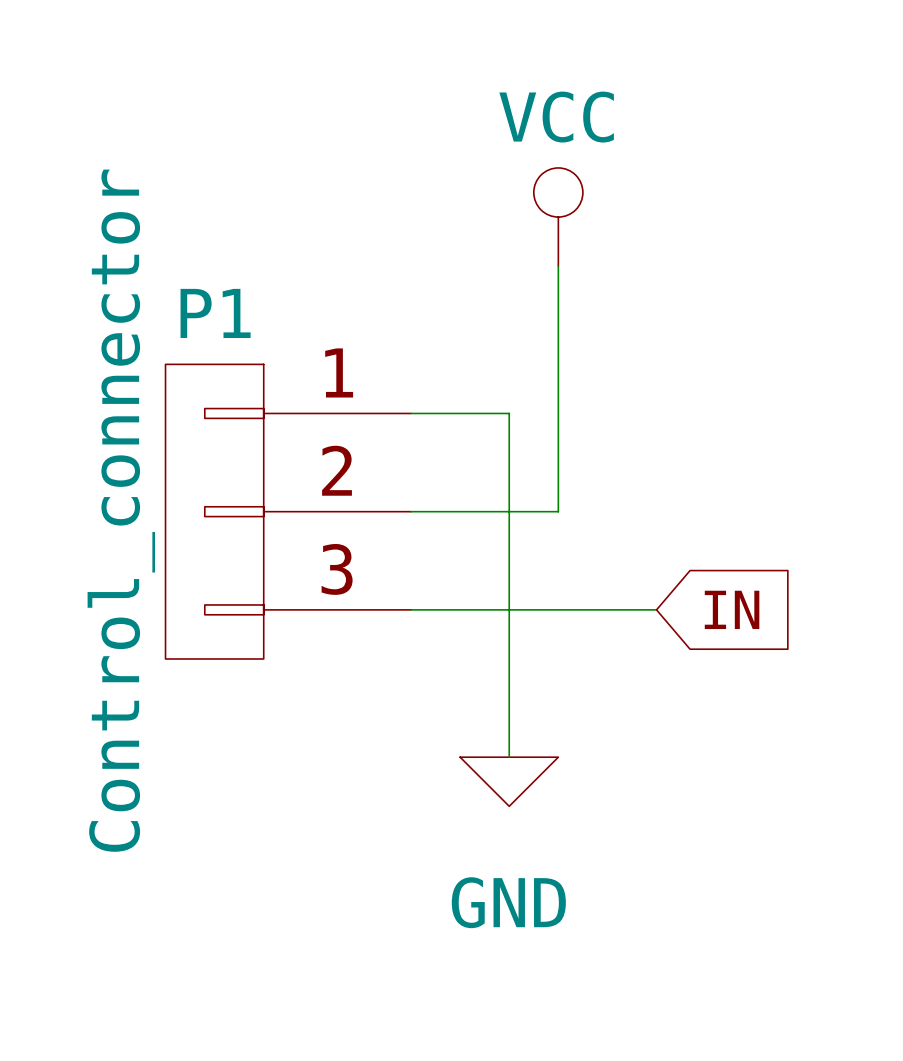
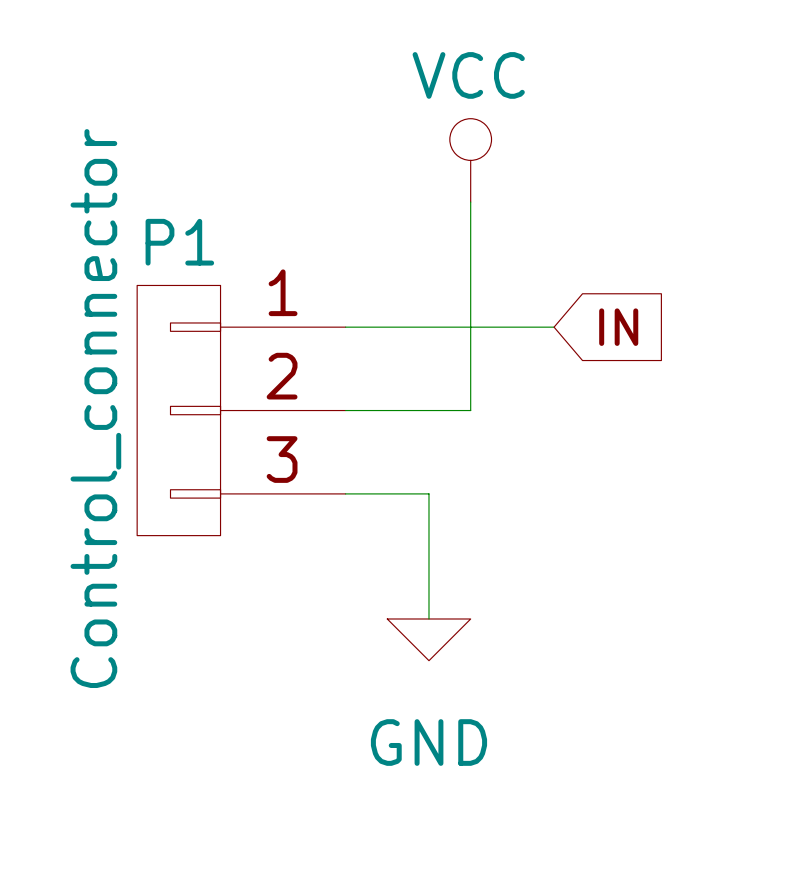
wire: (509, 413) (509, 609) (656, 609) -> (428, 327) (554, 327)
global label position: IN (732, 609) -> IN (618, 327)

